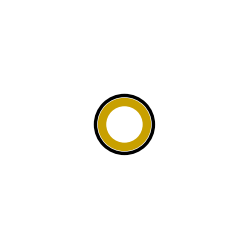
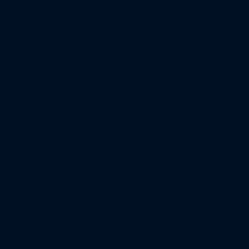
part: (124, 124) -> none

